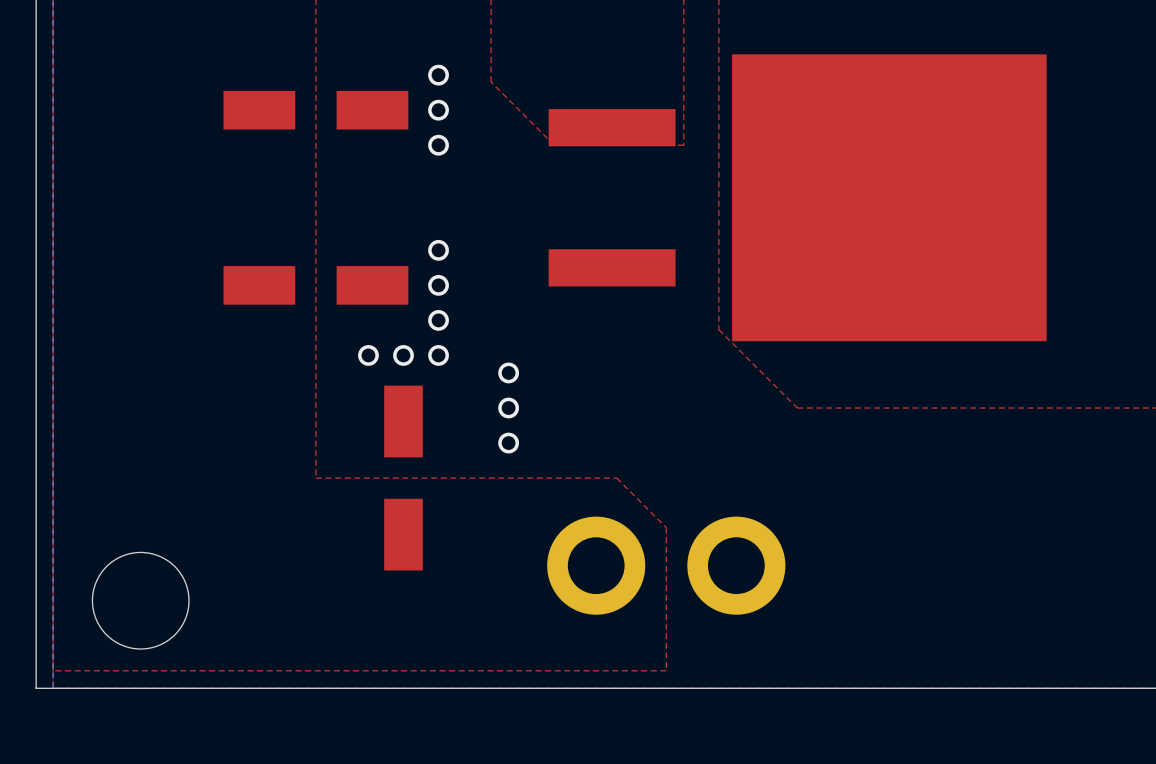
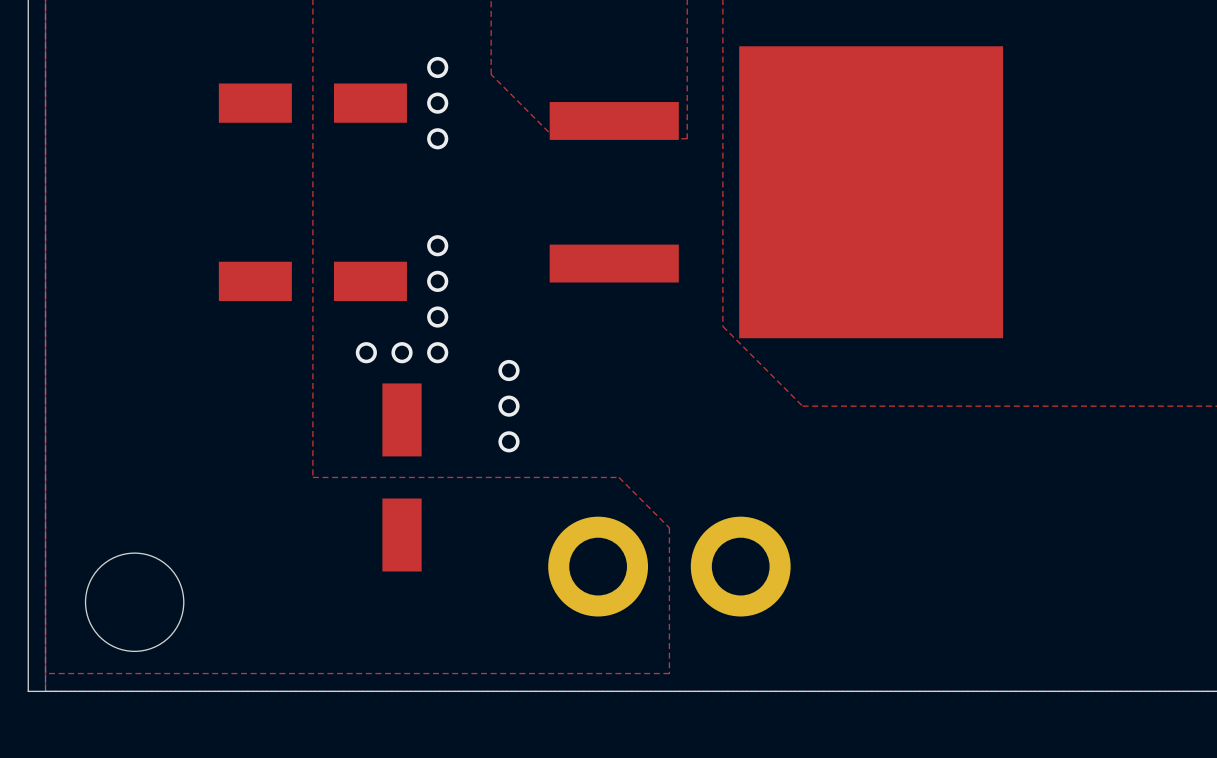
part footprint: [548, 54, 1047, 342] -> [549, 46, 1004, 339]

